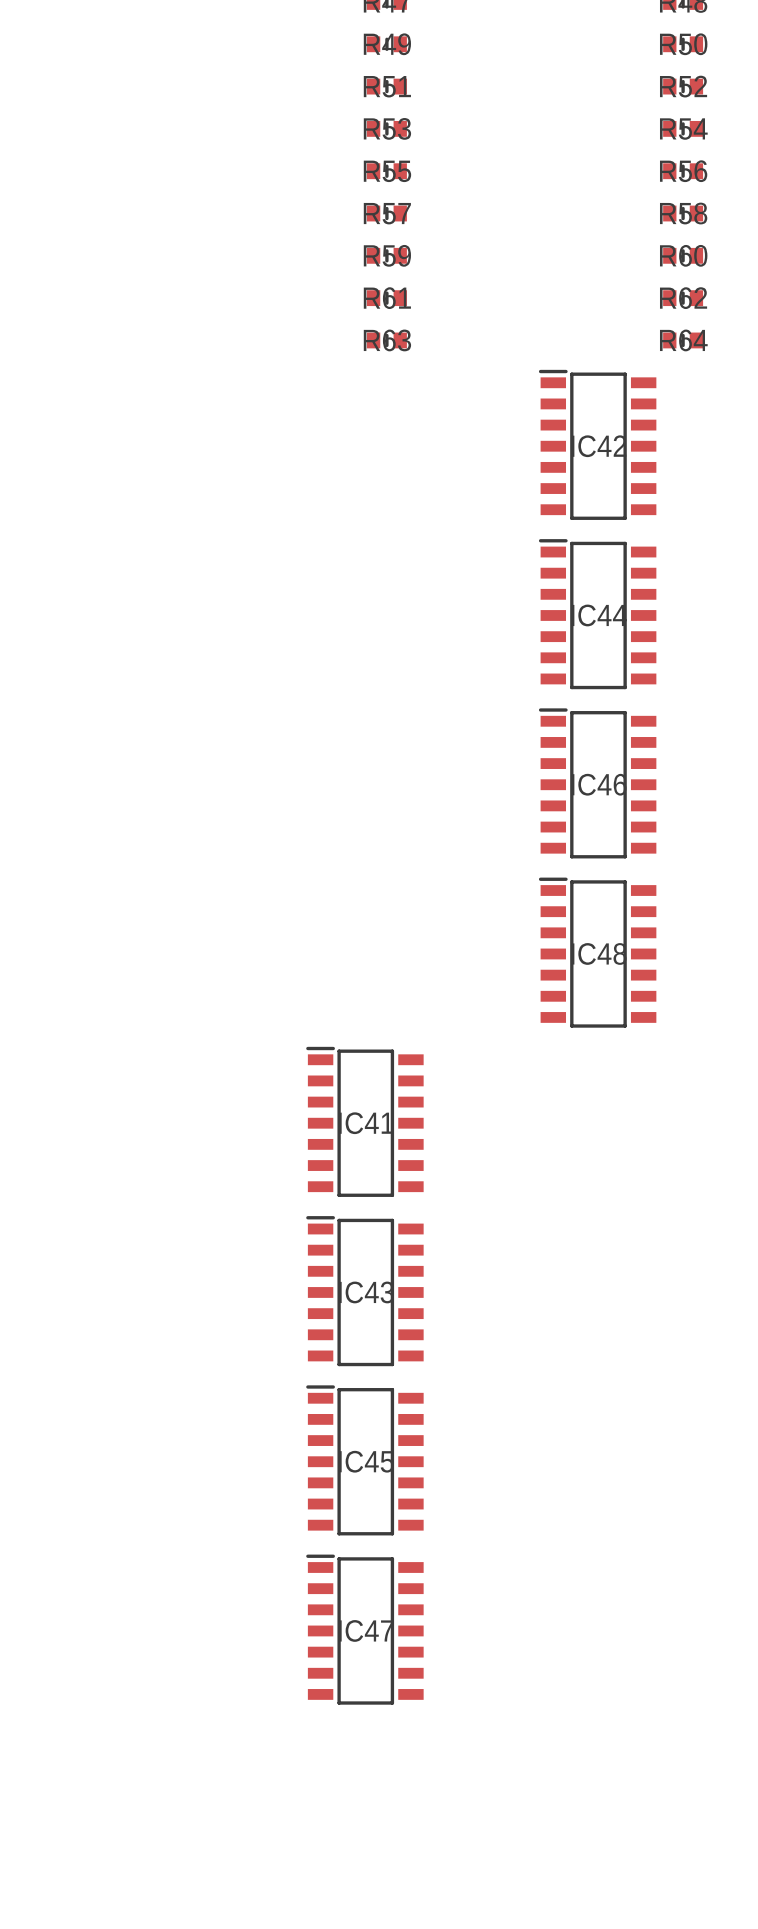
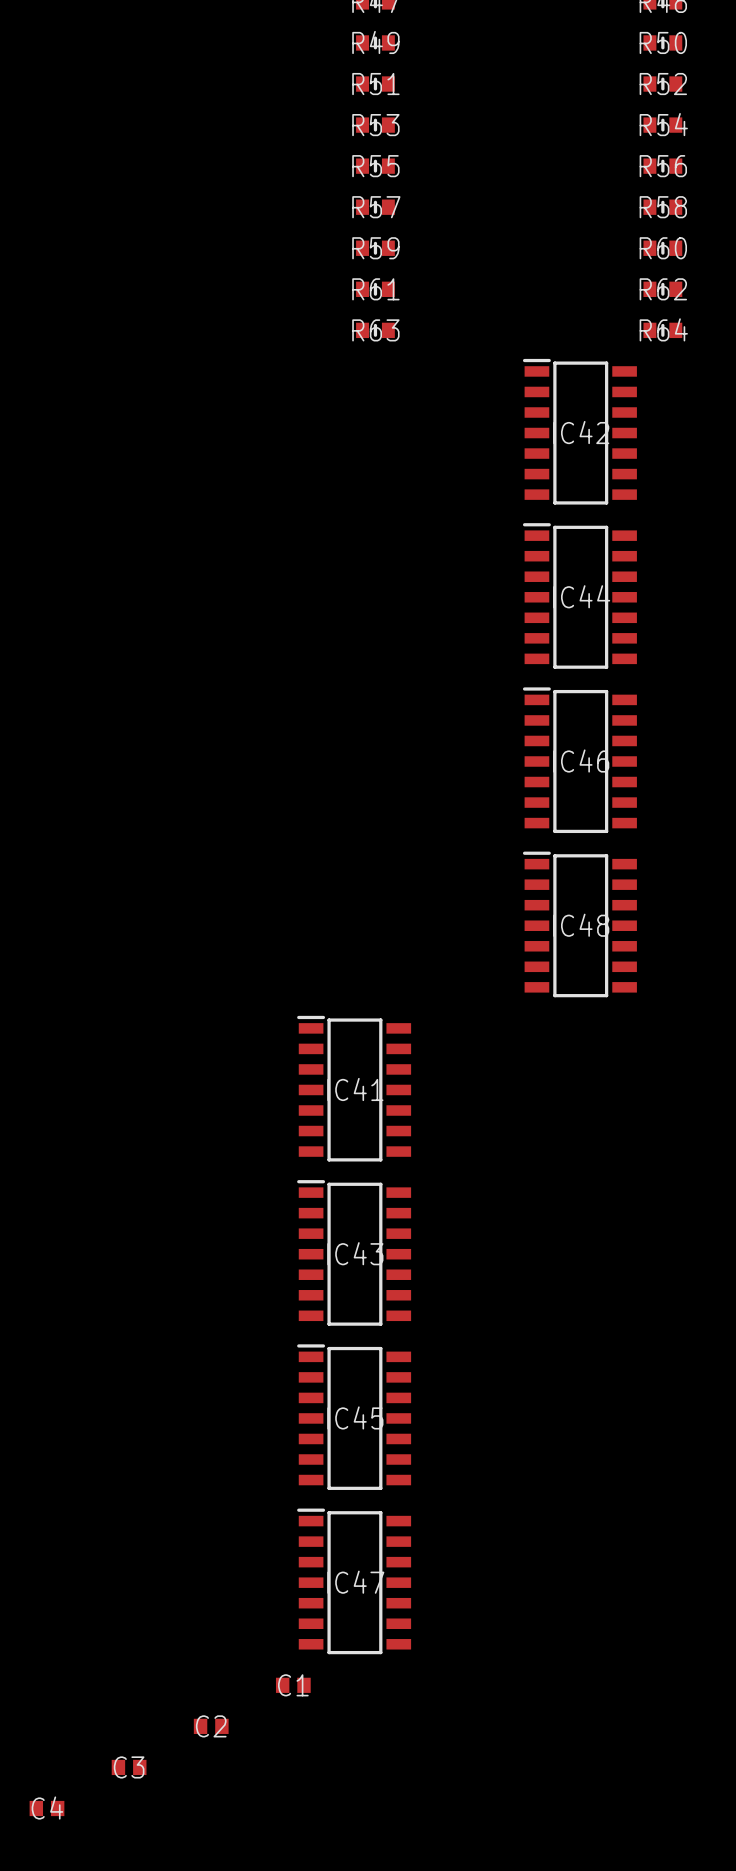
C1: none -> (293, 1685)
C2: none -> (211, 1726)
C3: none -> (129, 1767)
C4: none -> (46, 1808)

